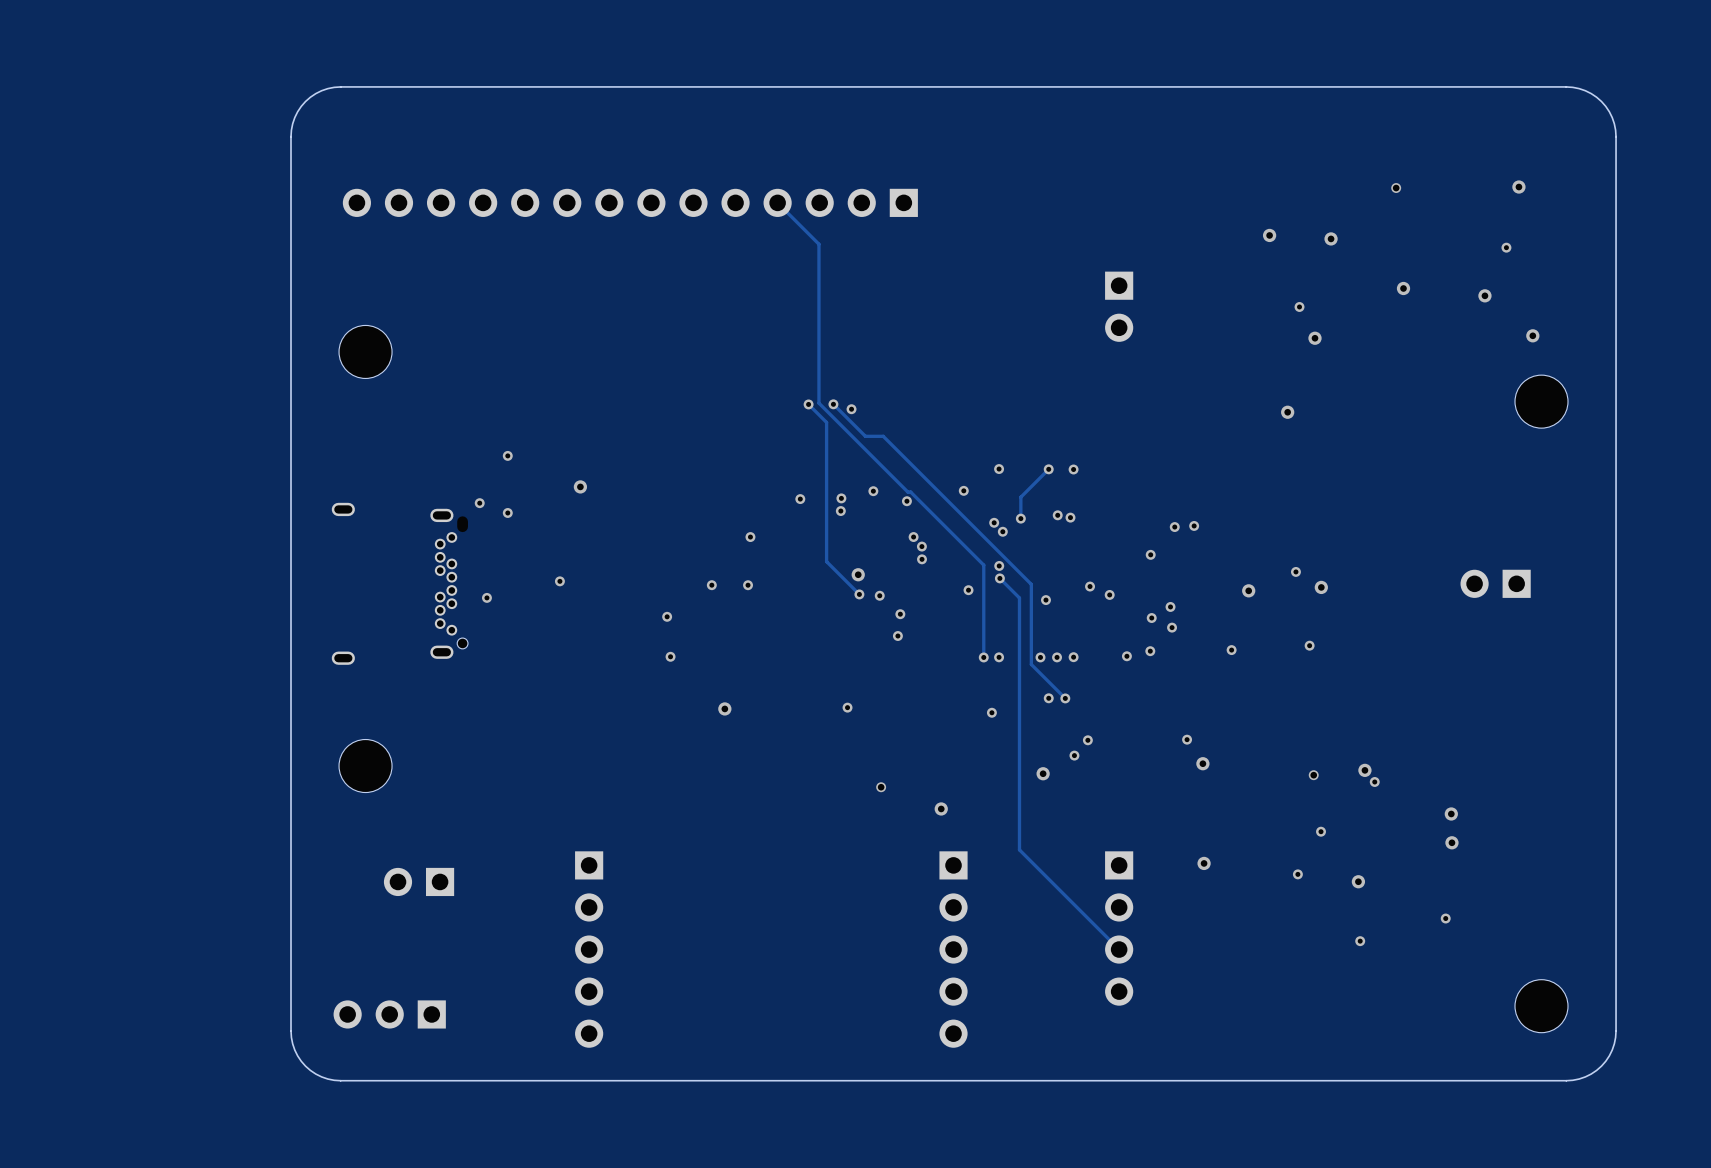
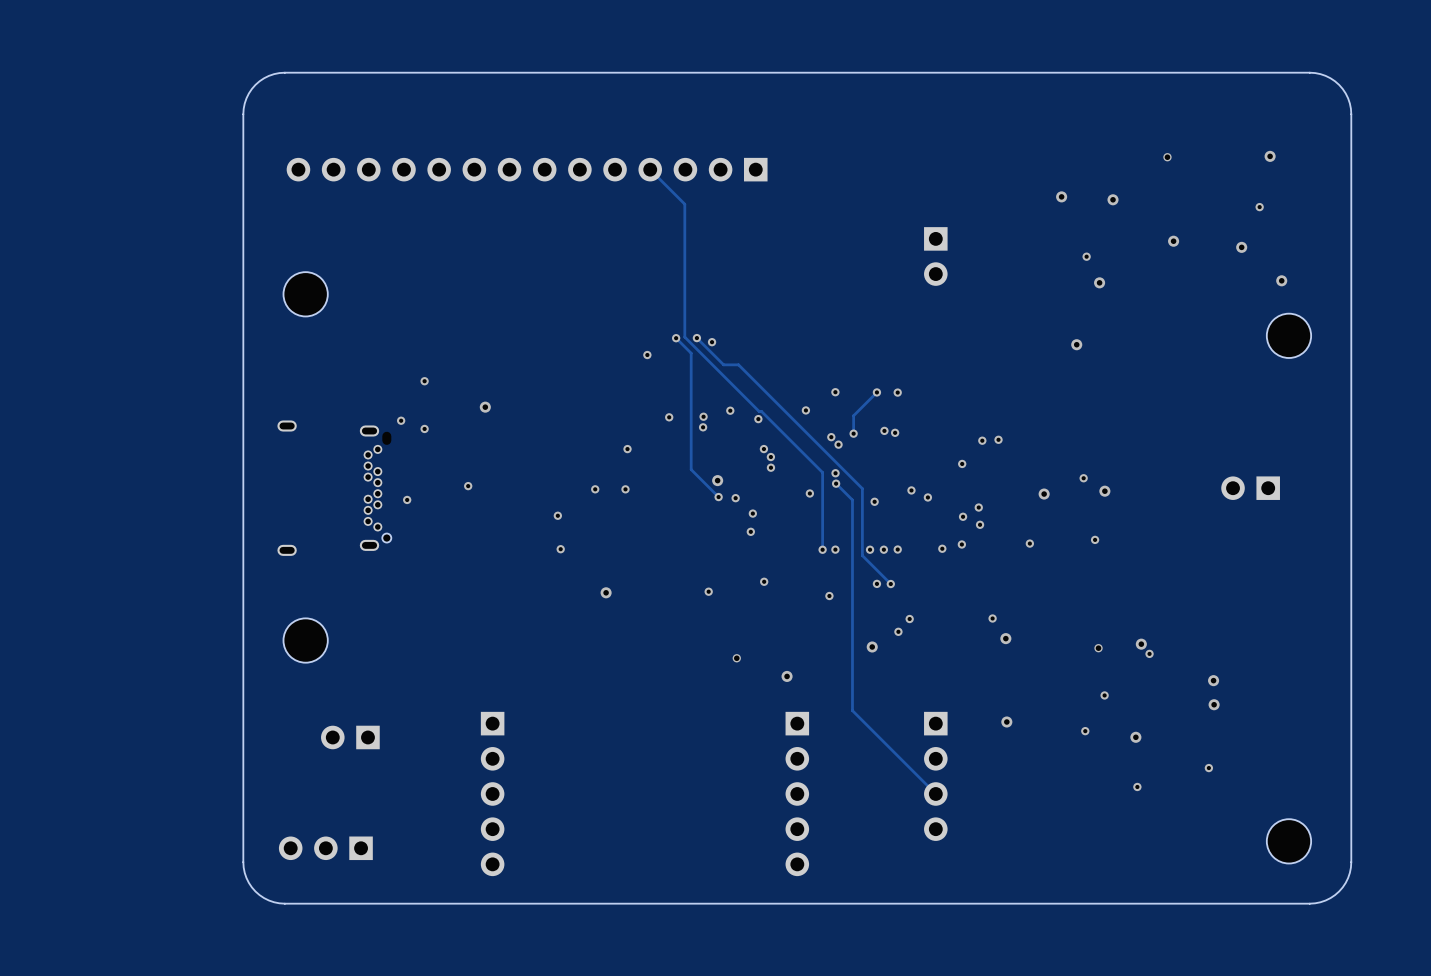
via: none -> (647, 355)
via: none -> (764, 581)

